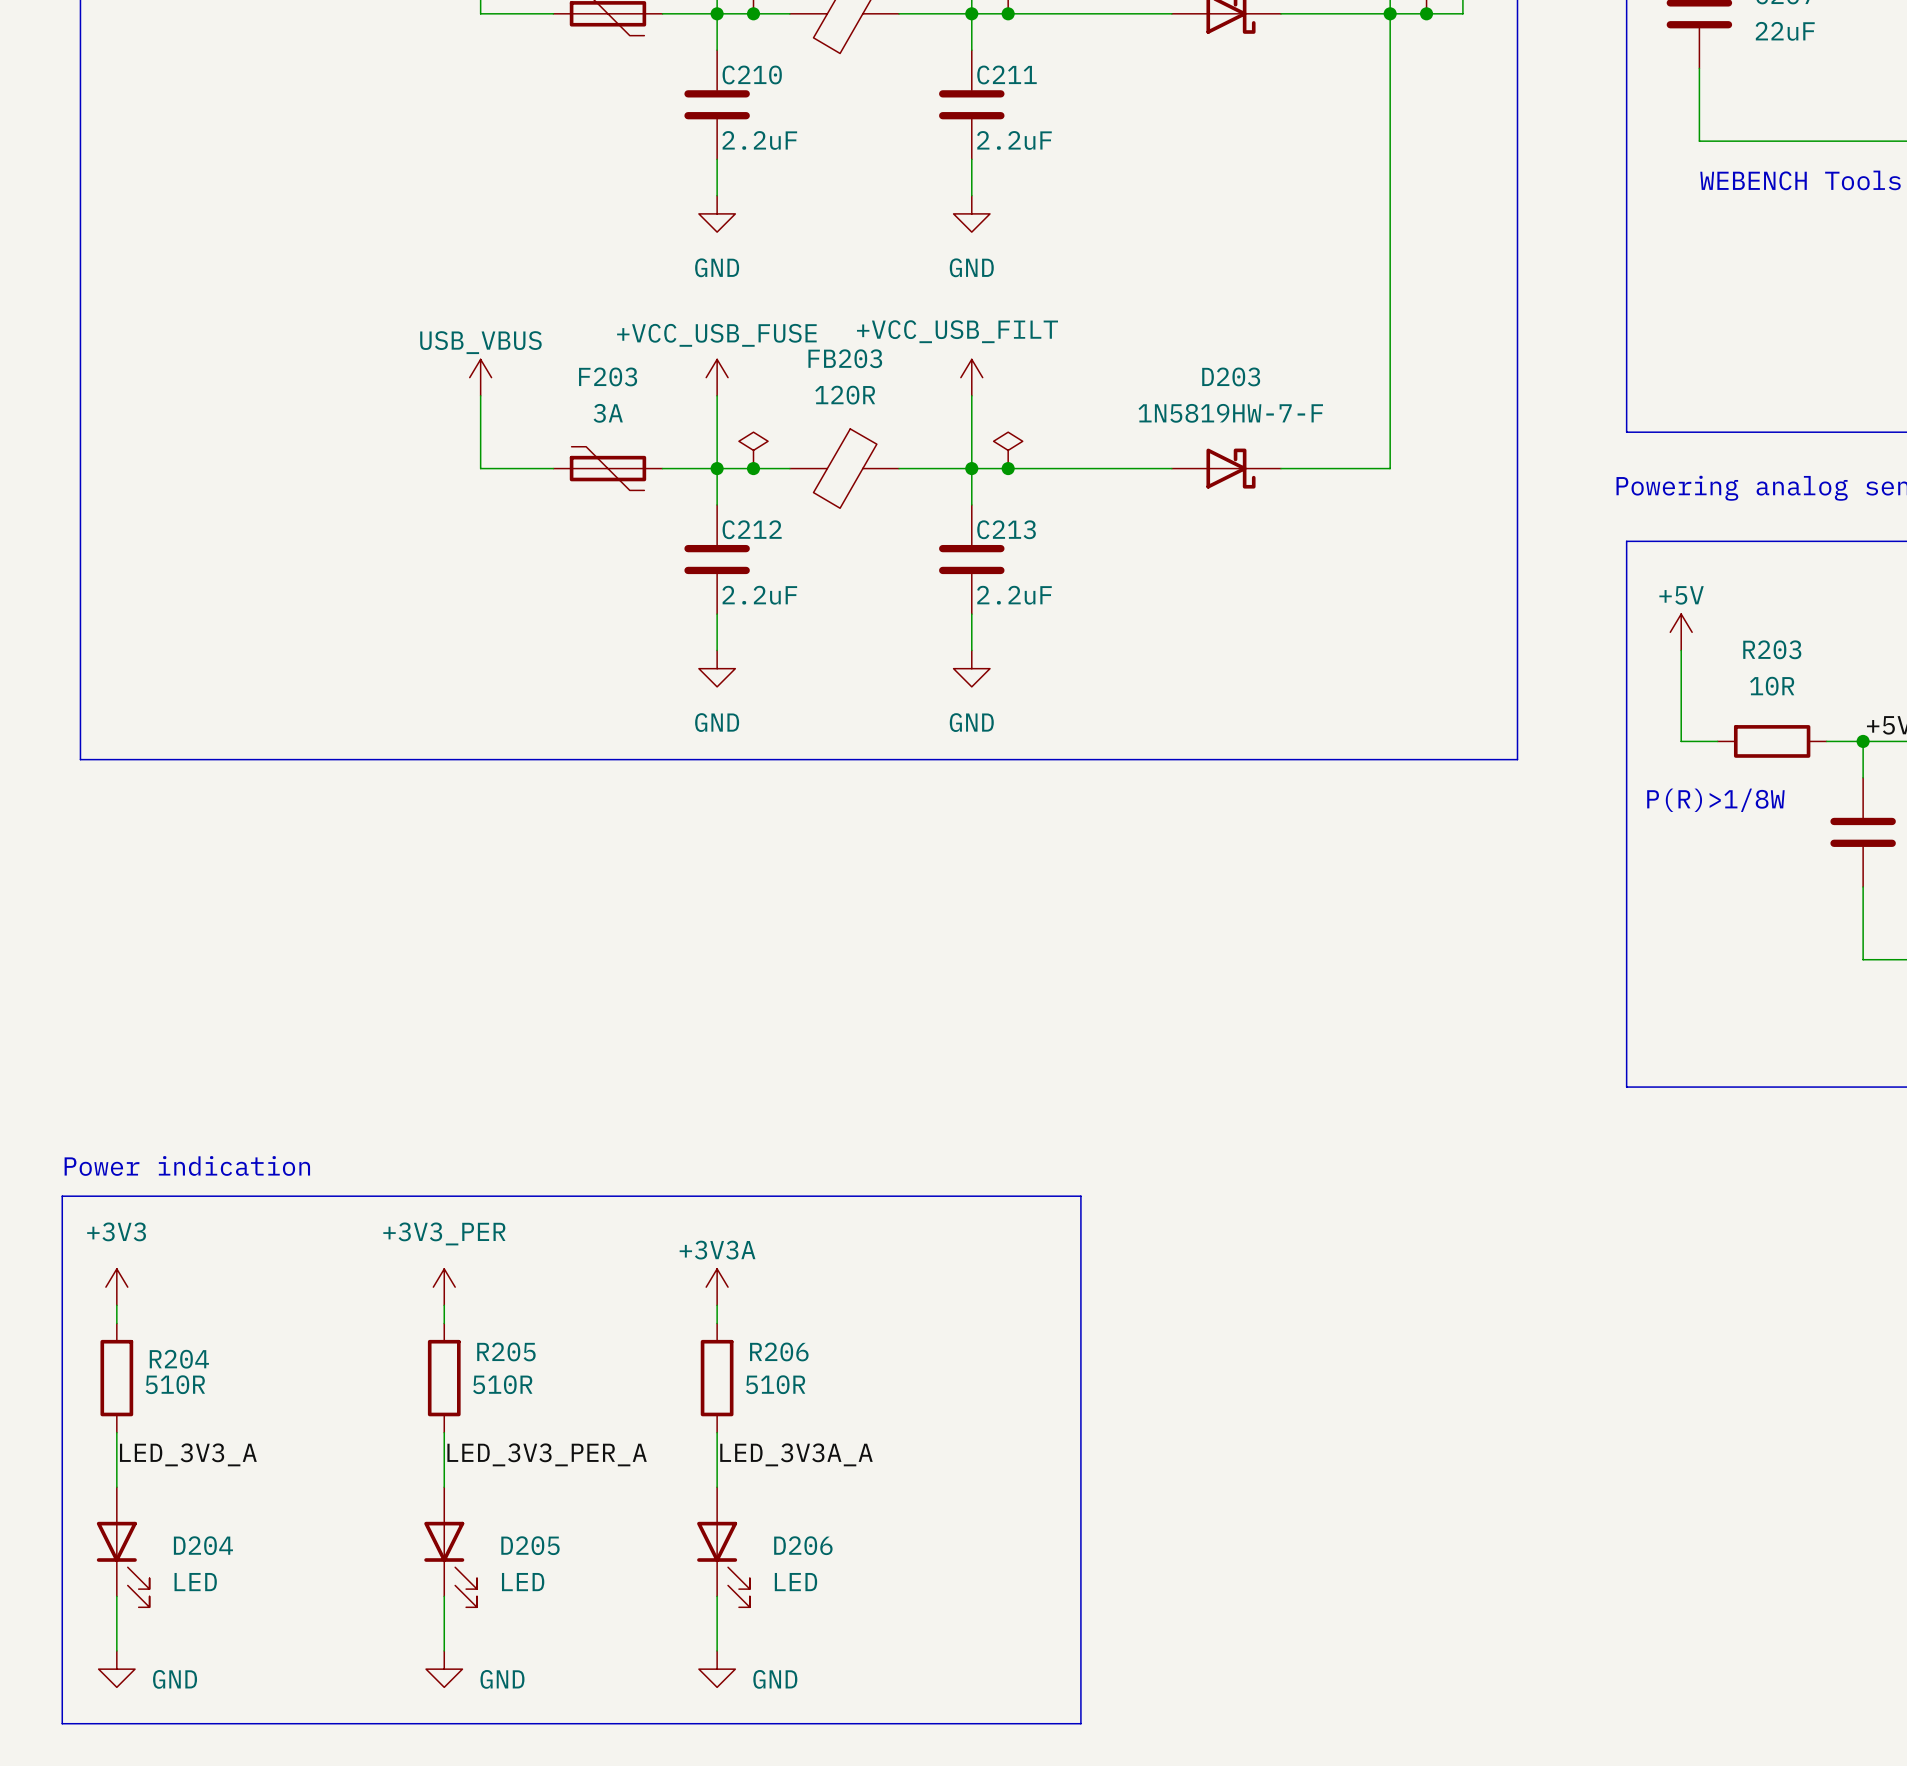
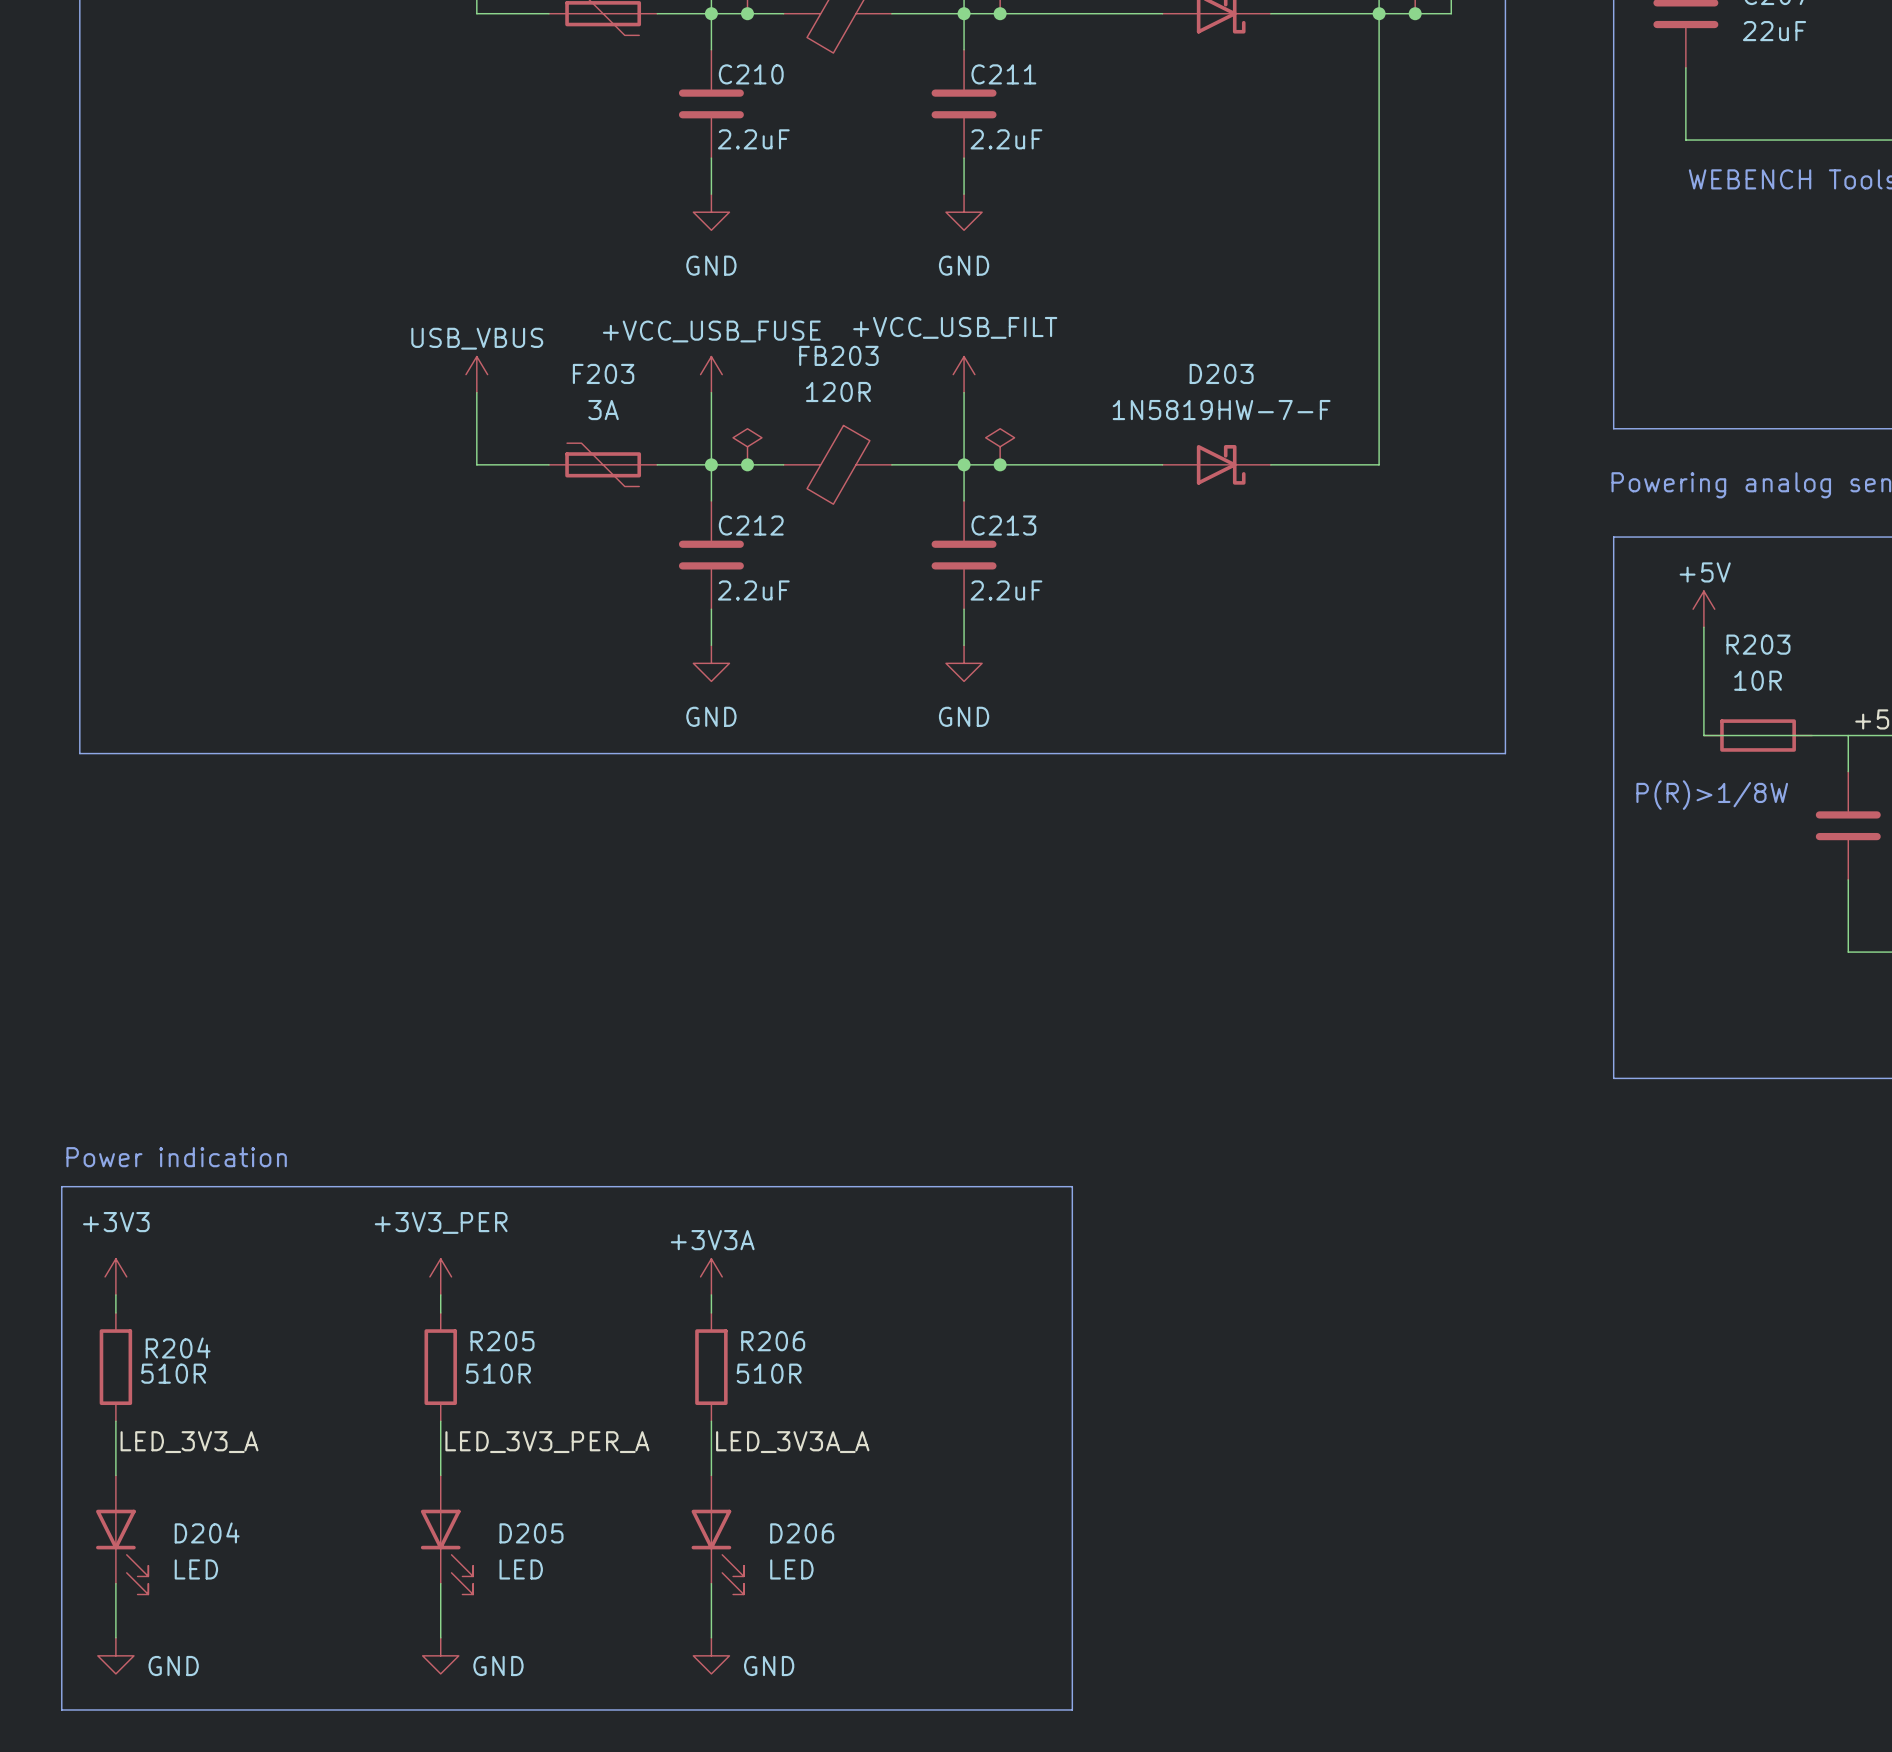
power symbol position: +5V (1681, 632) -> +5V (1703, 609)
wire: none -> (1703, 627) (1703, 735) (1812, 735)
wire: (1681, 650) (1681, 741) (1717, 741) -> none
junction: (1863, 741) -> none

